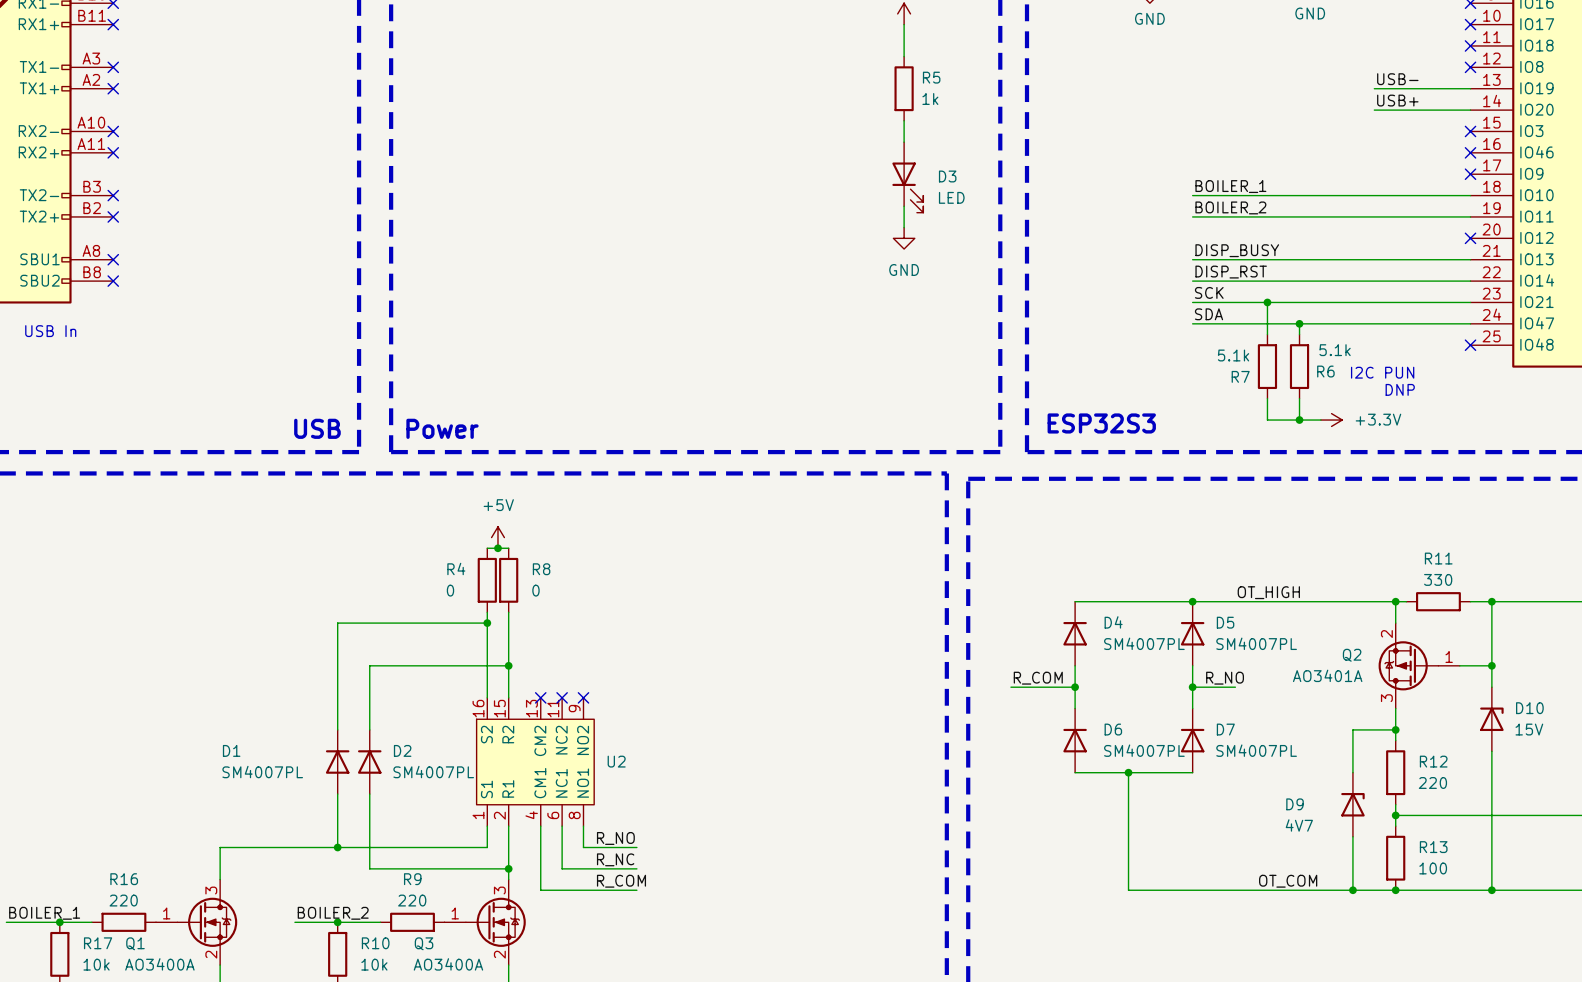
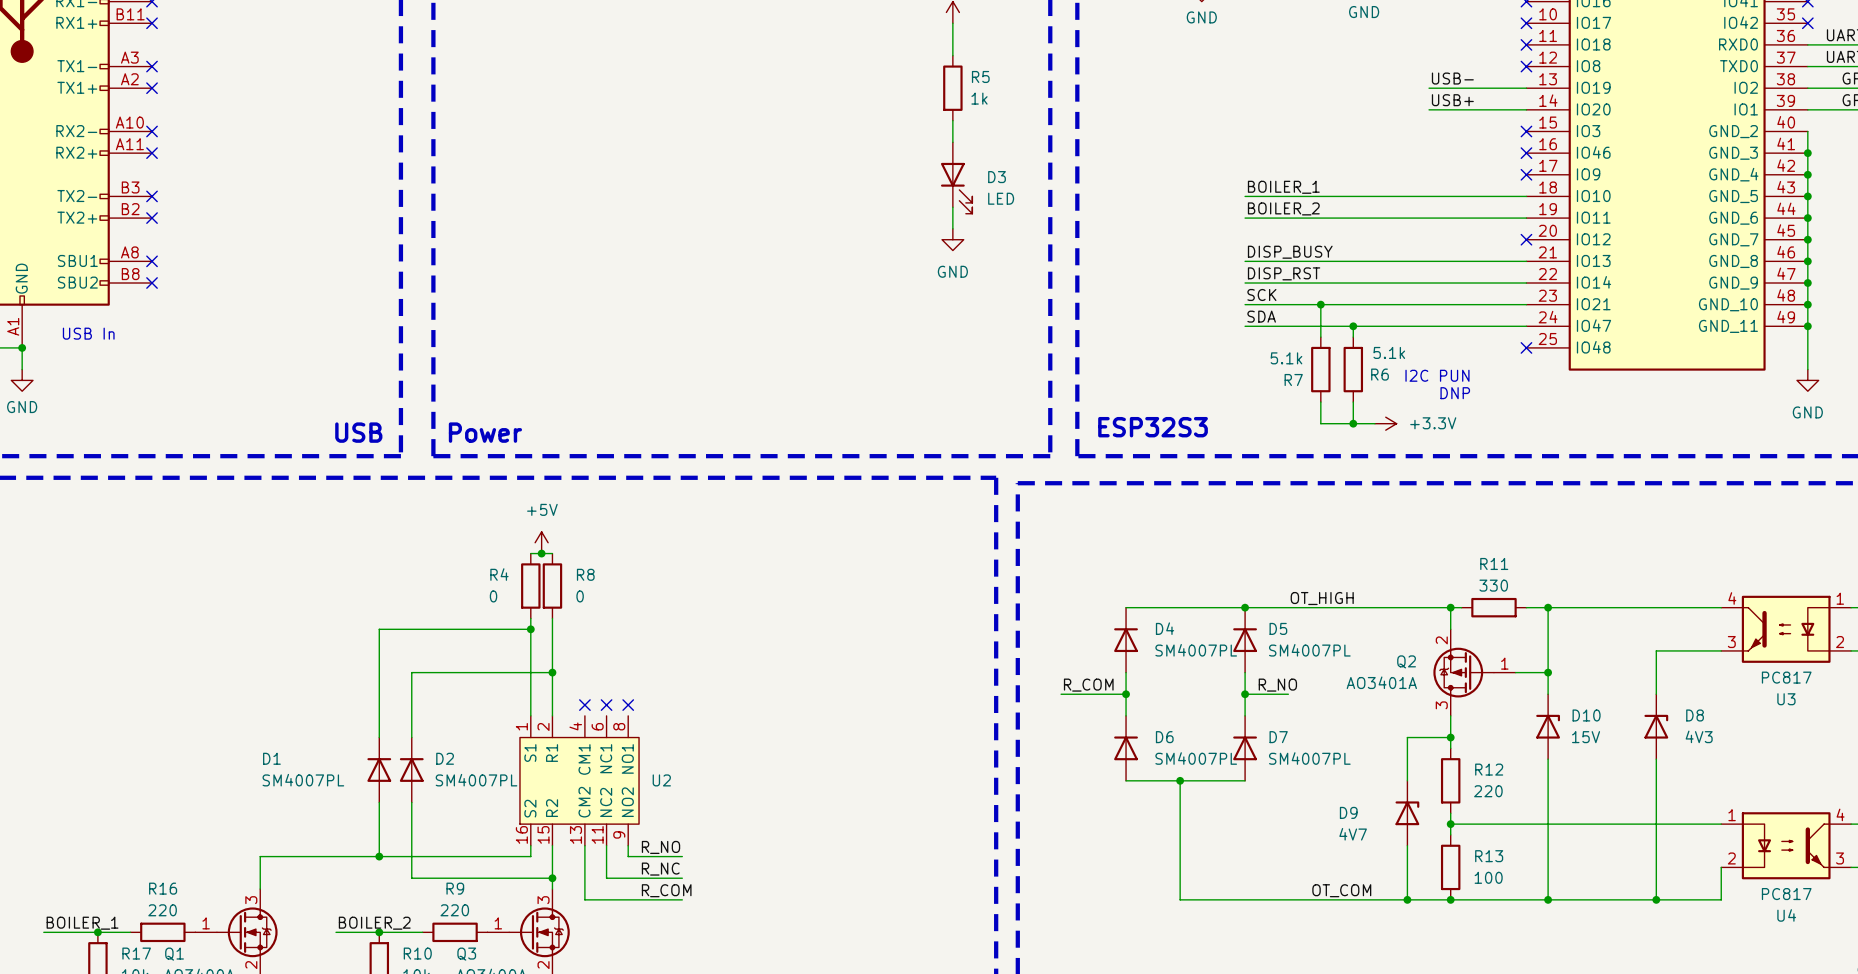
U2 flip: as is (535, 762) -> up-down (579, 780)

